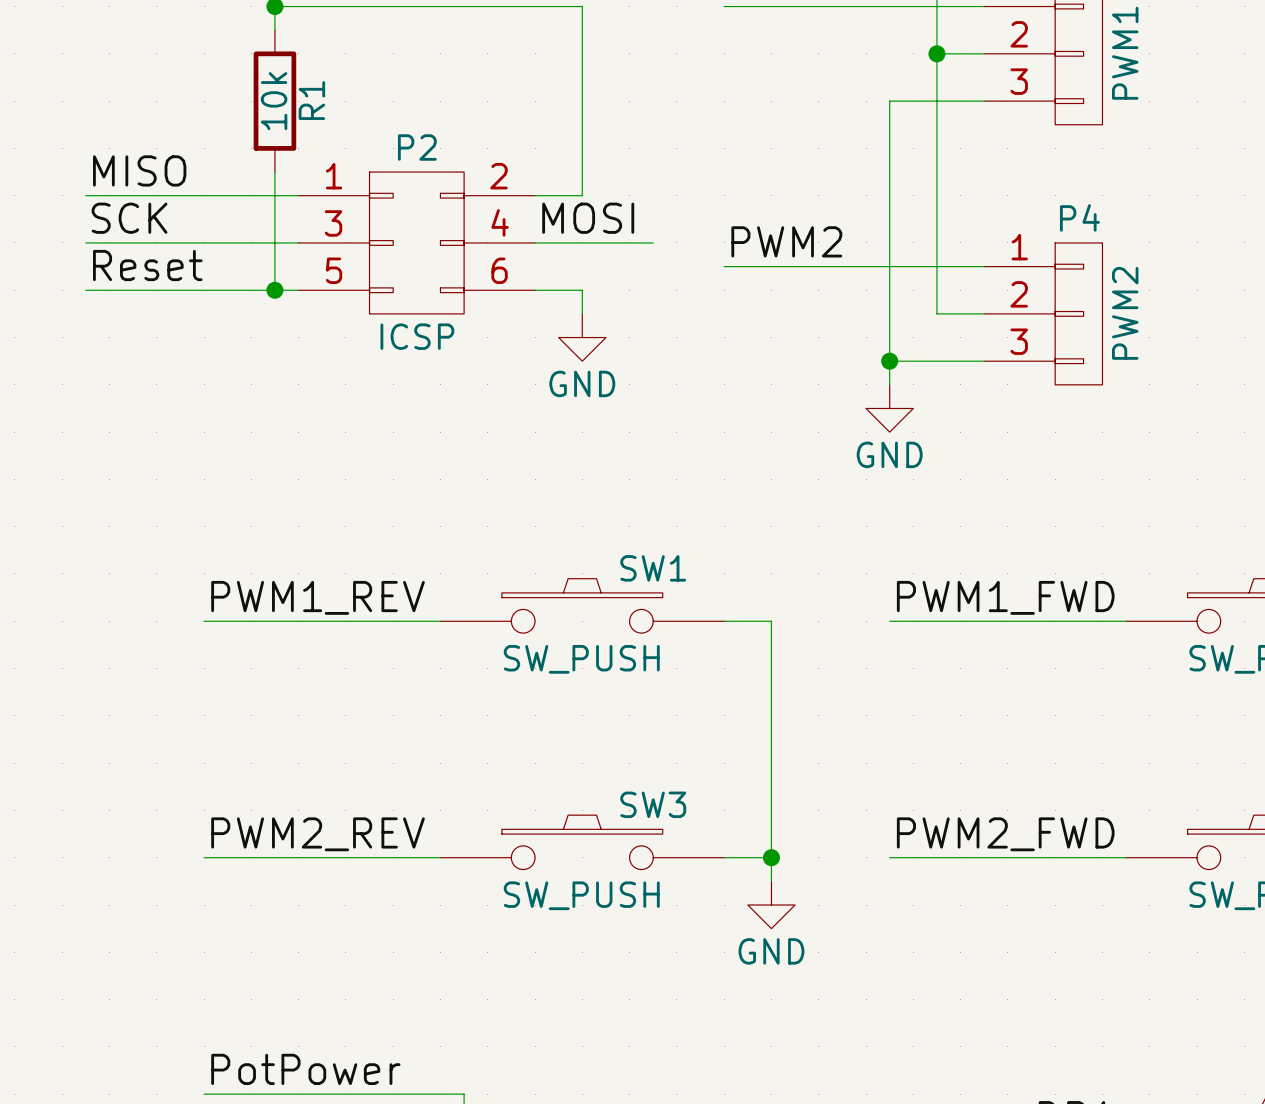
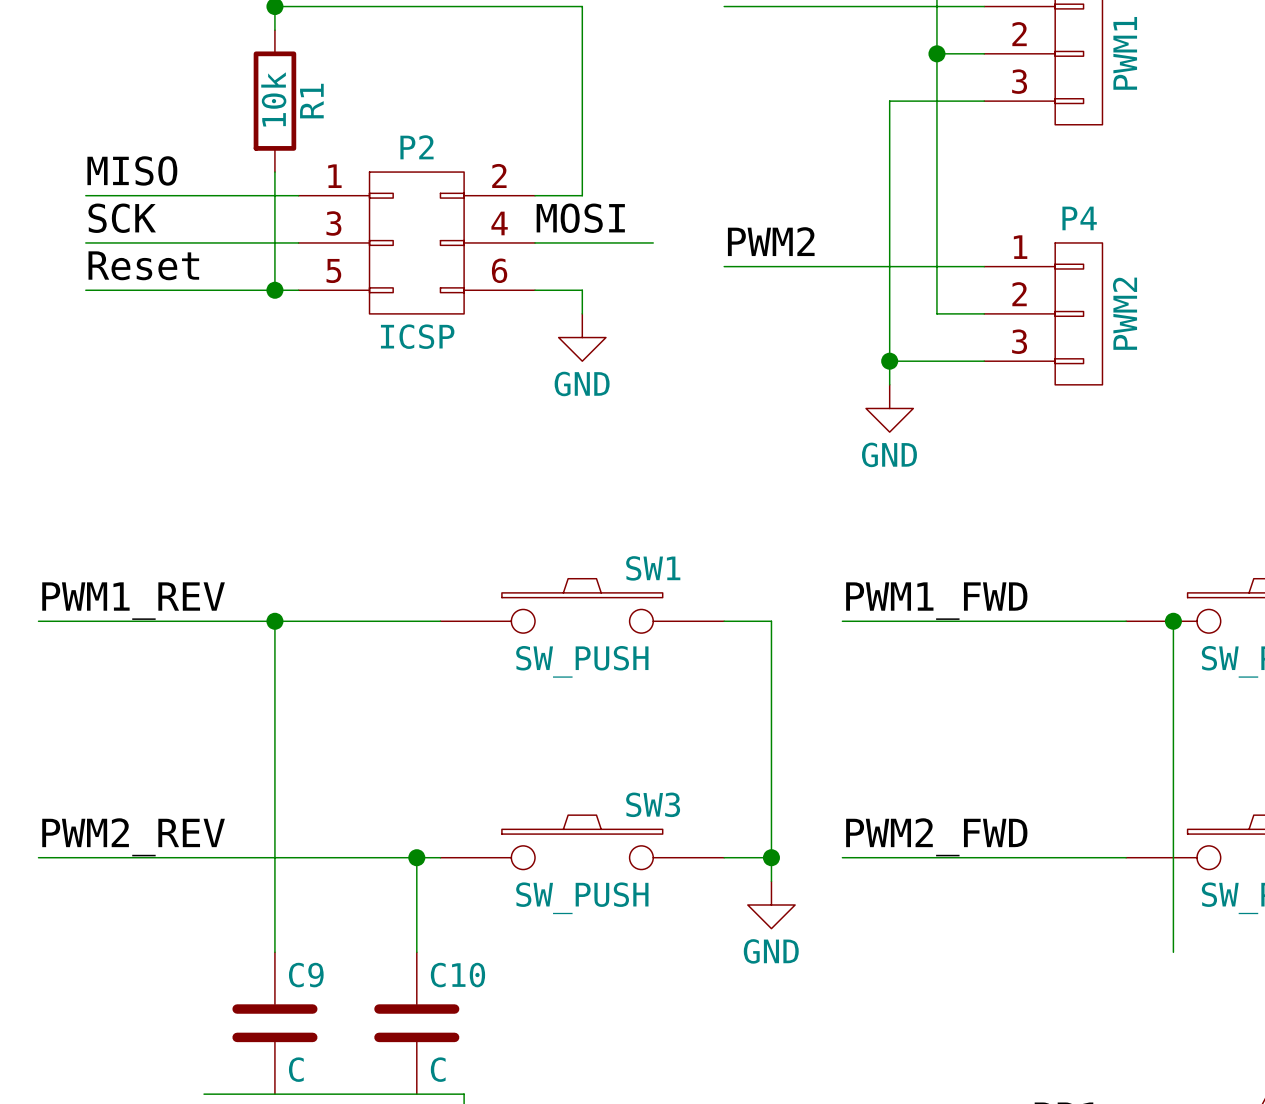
label position: PWM1_REV (318, 597) -> PWM1_REV (133, 601)
label position: PWM1_FWD (1005, 597) -> PWM1_FWD (936, 601)
wire: none -> (38, 621) (204, 621)
wire: none -> (274, 621) (274, 952)
junction: none -> (274, 621)
wire: none -> (842, 621) (889, 621)
wire: none -> (1173, 621) (1173, 952)
junction: none -> (1173, 621)
label position: PWM2_REV (318, 834) -> PWM2_REV (133, 837)
label position: PWM2_FWD (1005, 834) -> PWM2_FWD (936, 837)
wire: none -> (38, 857) (204, 857)
wire: none -> (416, 857) (416, 952)
junction: none -> (416, 857)
wire: none -> (842, 857) (889, 857)
C9: none -> C (274, 1023)
C10: none -> C (416, 1023)
label: PotPower (305, 1069) -> none

